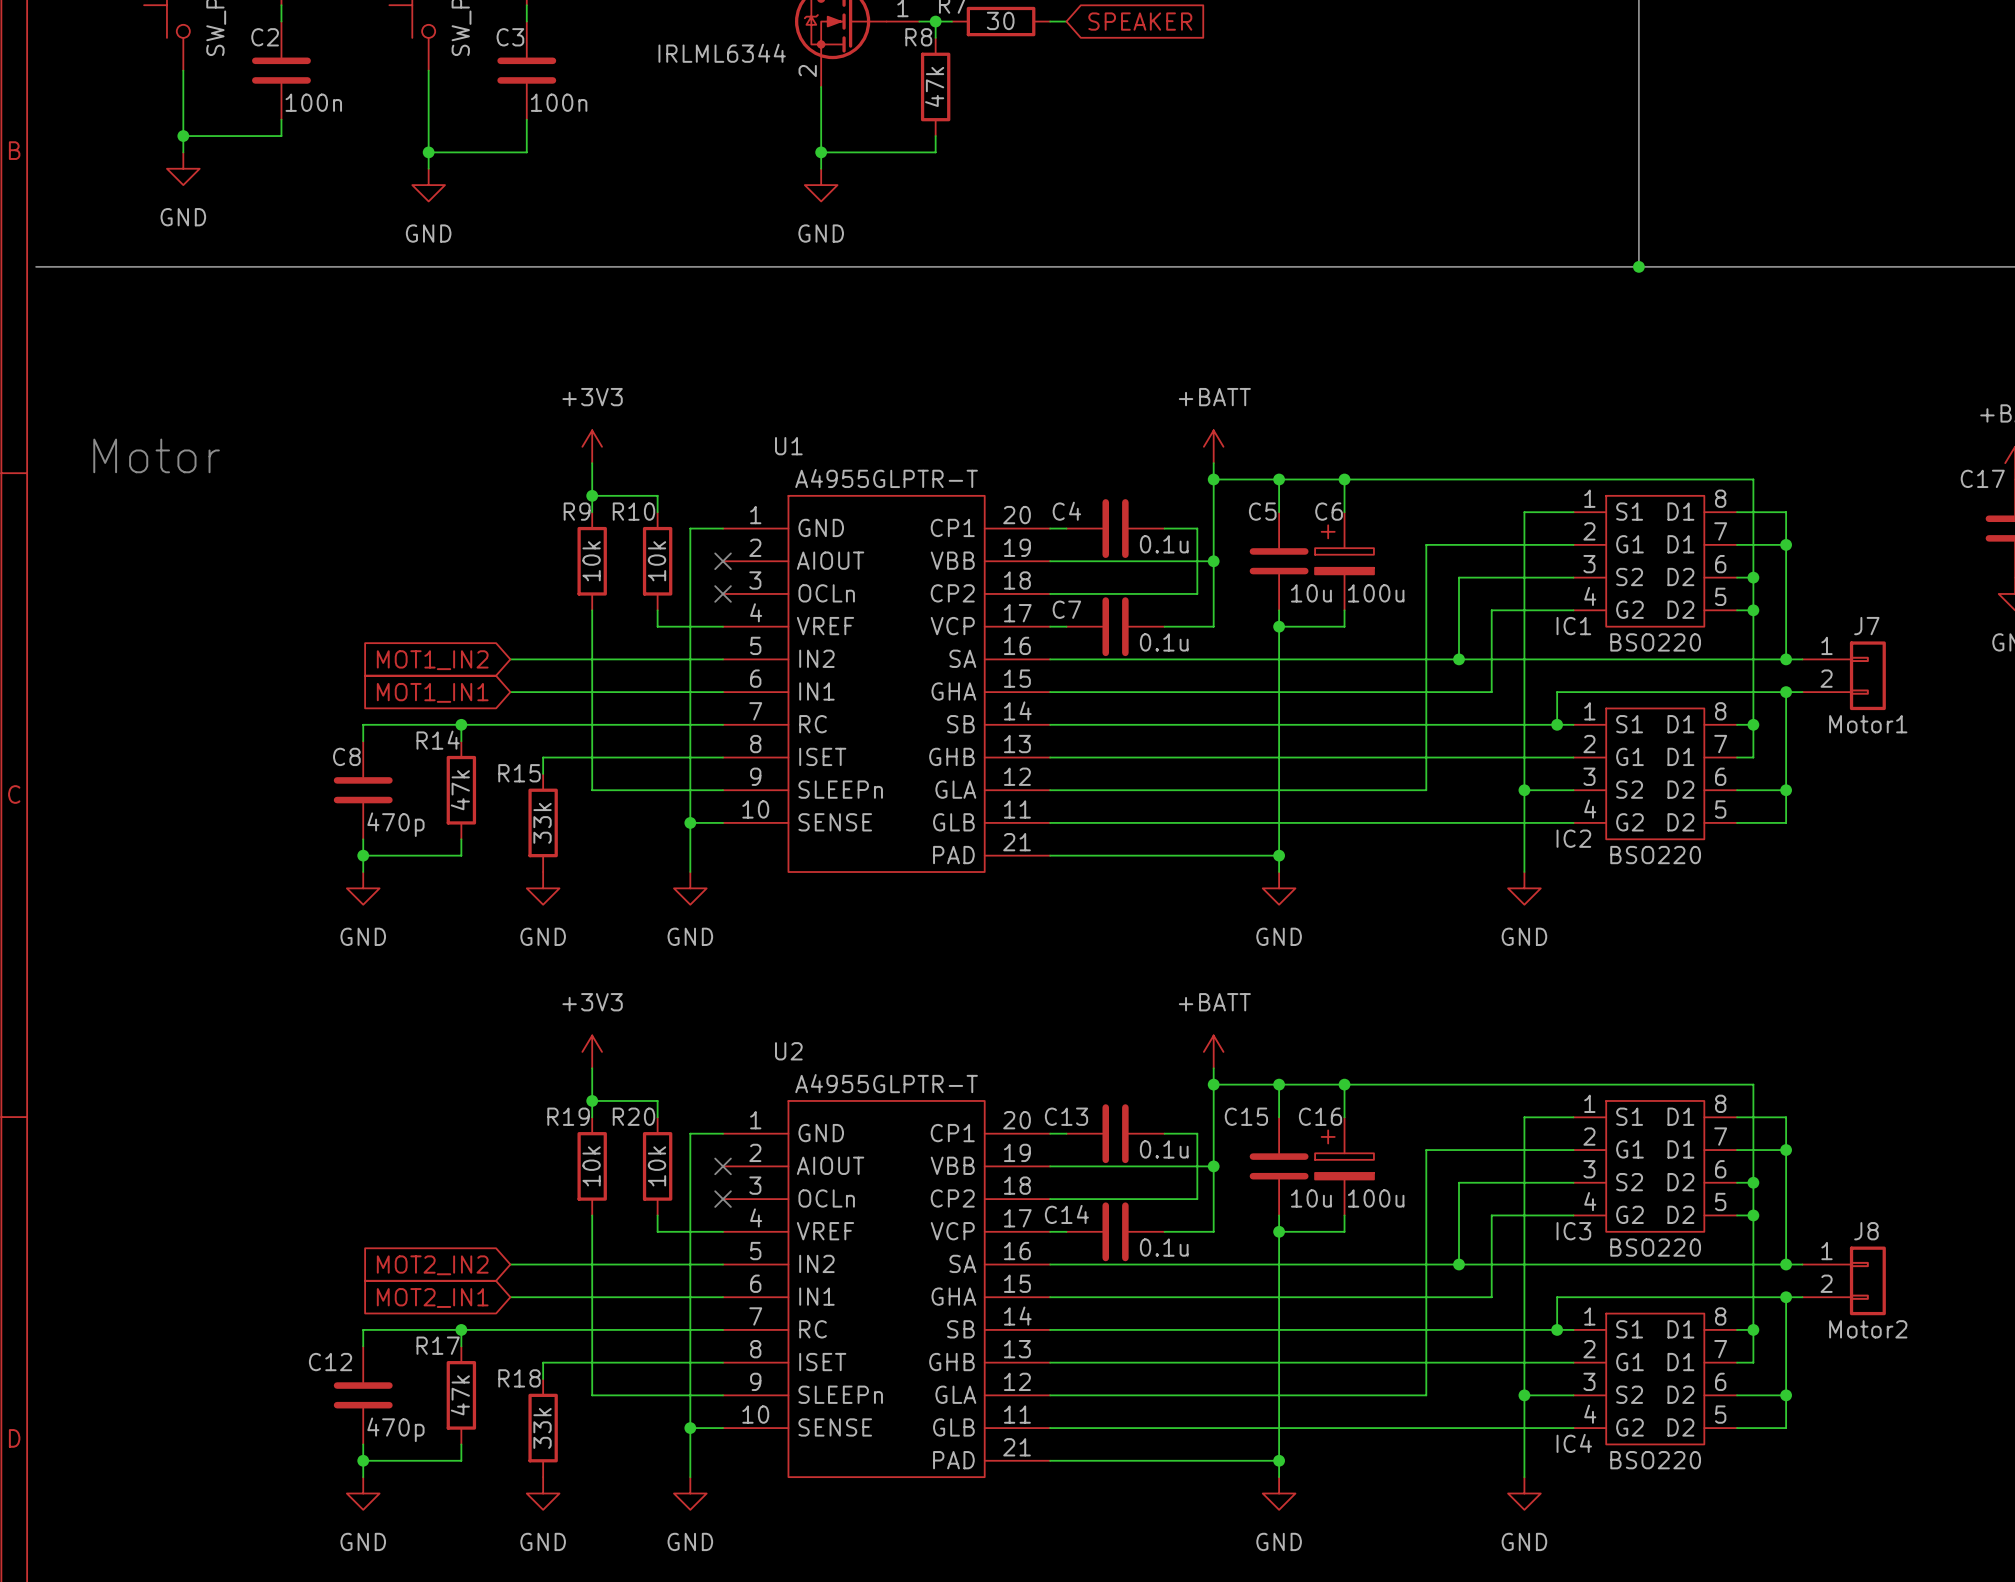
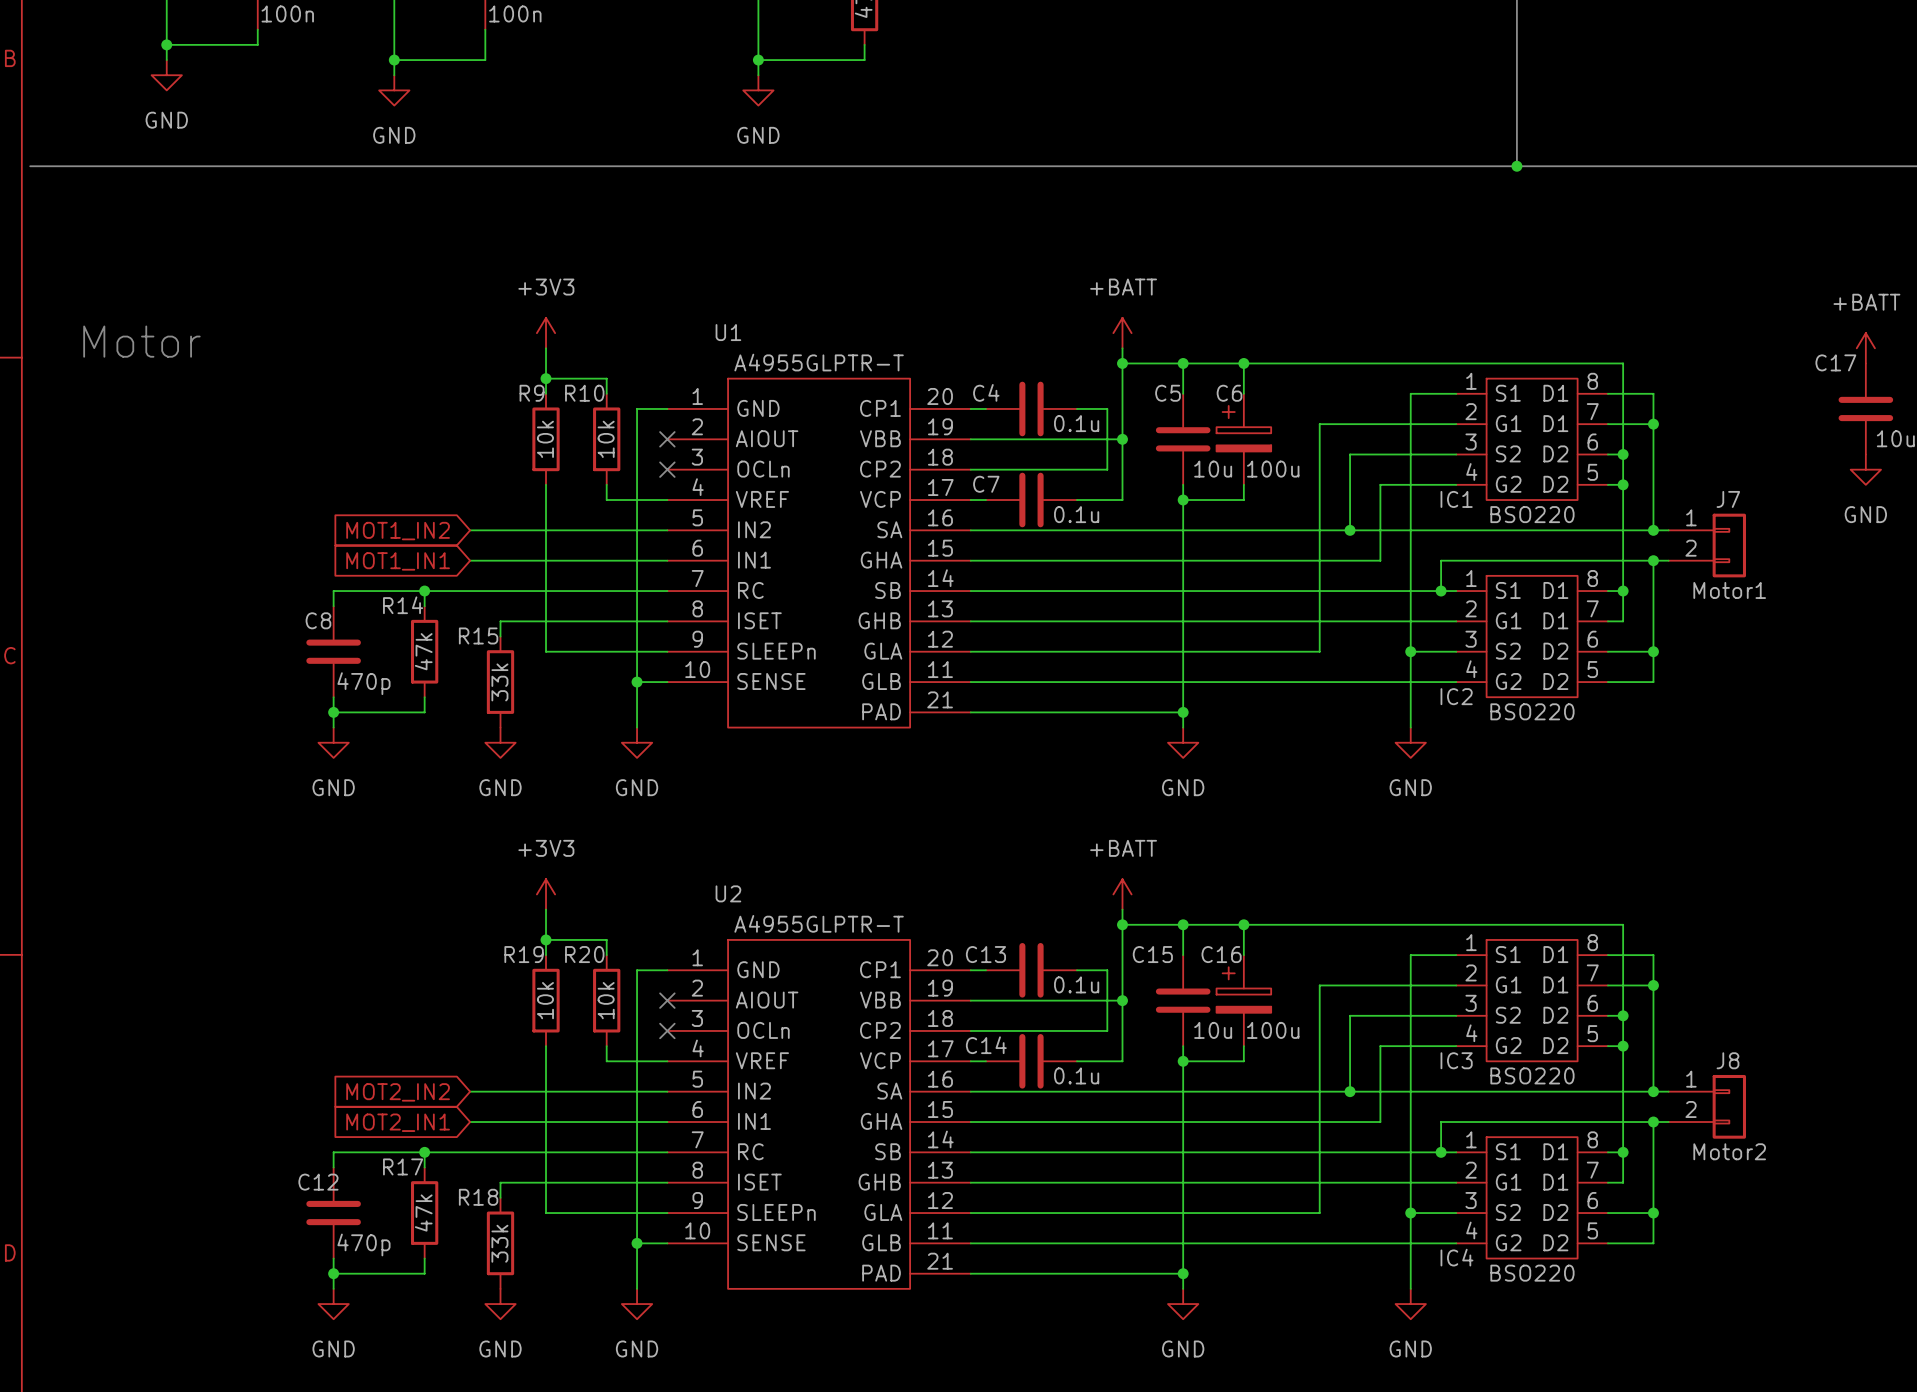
C12 name position: C12 (330, 1362) -> C12 (318, 1182)

